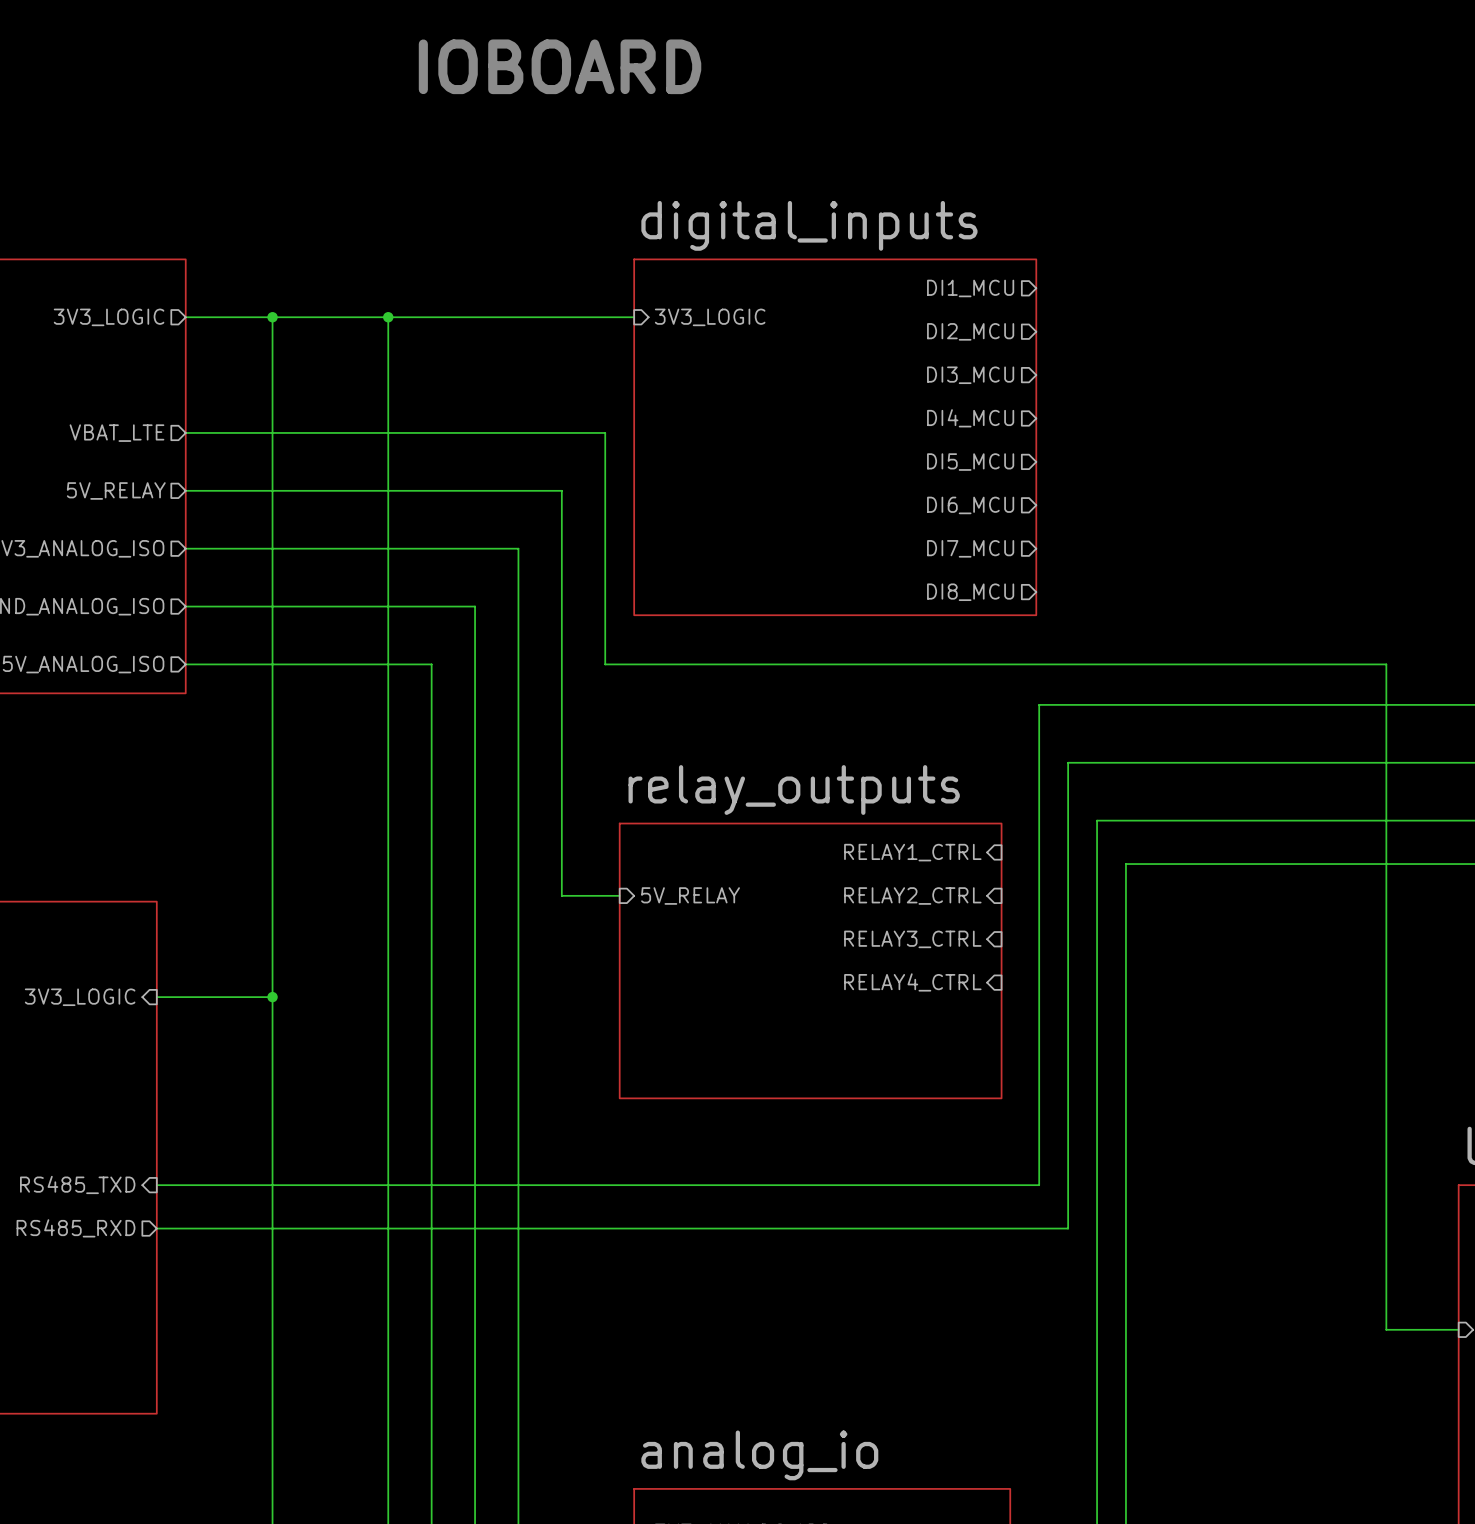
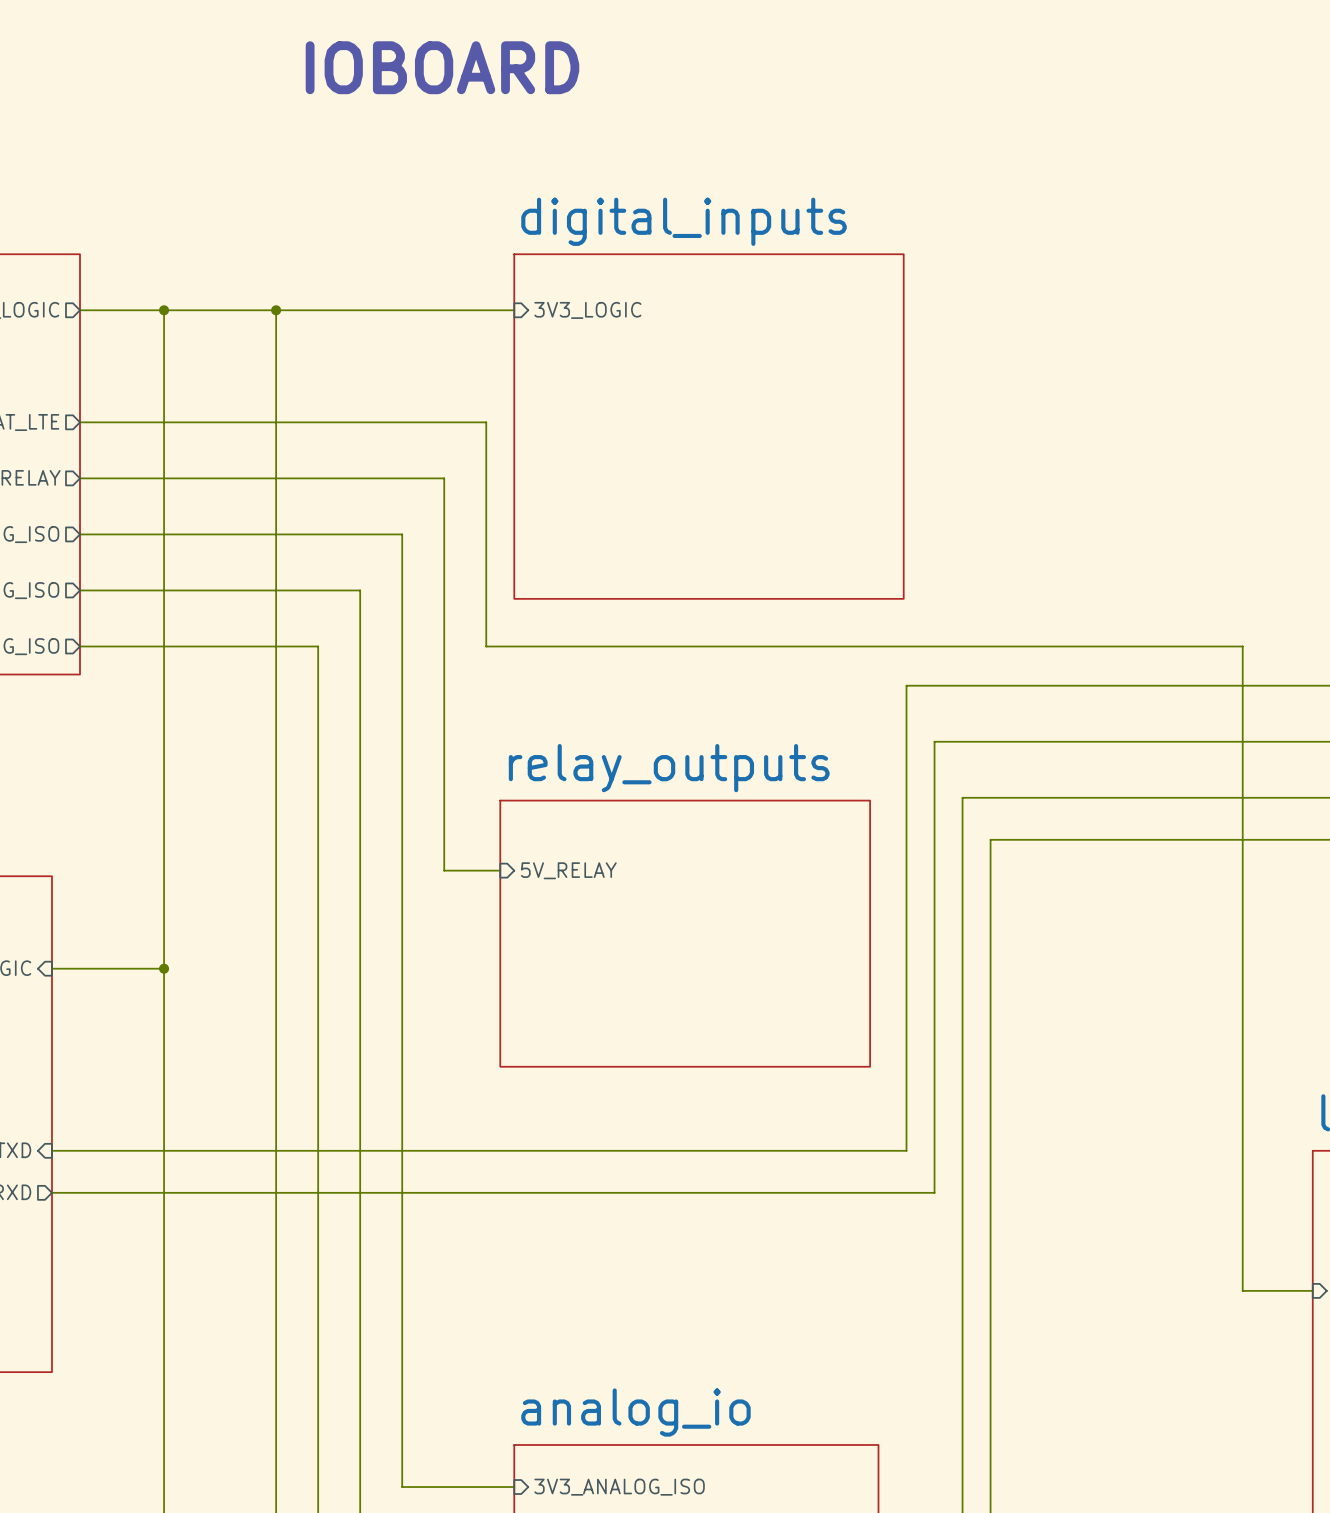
sheet pin: DI1_MCU (970, 288) -> none
sheet pin: DI2_MCU (970, 331) -> none
sheet pin: DI3_MCU (970, 375) -> none
sheet pin: DI4_MCU (970, 418) -> none
sheet pin: DI5_MCU (970, 462) -> none
sheet pin: DI6_MCU (970, 505) -> none
sheet pin: DI7_MCU (970, 548) -> none
sheet pin: DI8_MCU (970, 592) -> none
sheet pin: RELAY1_CTRL (912, 852) -> none
sheet pin: RELAY2_CTRL (912, 896) -> none
sheet pin: RELAY3_CTRL (912, 939) -> none
sheet pin: RELAY4_CTRL (912, 982) -> none

